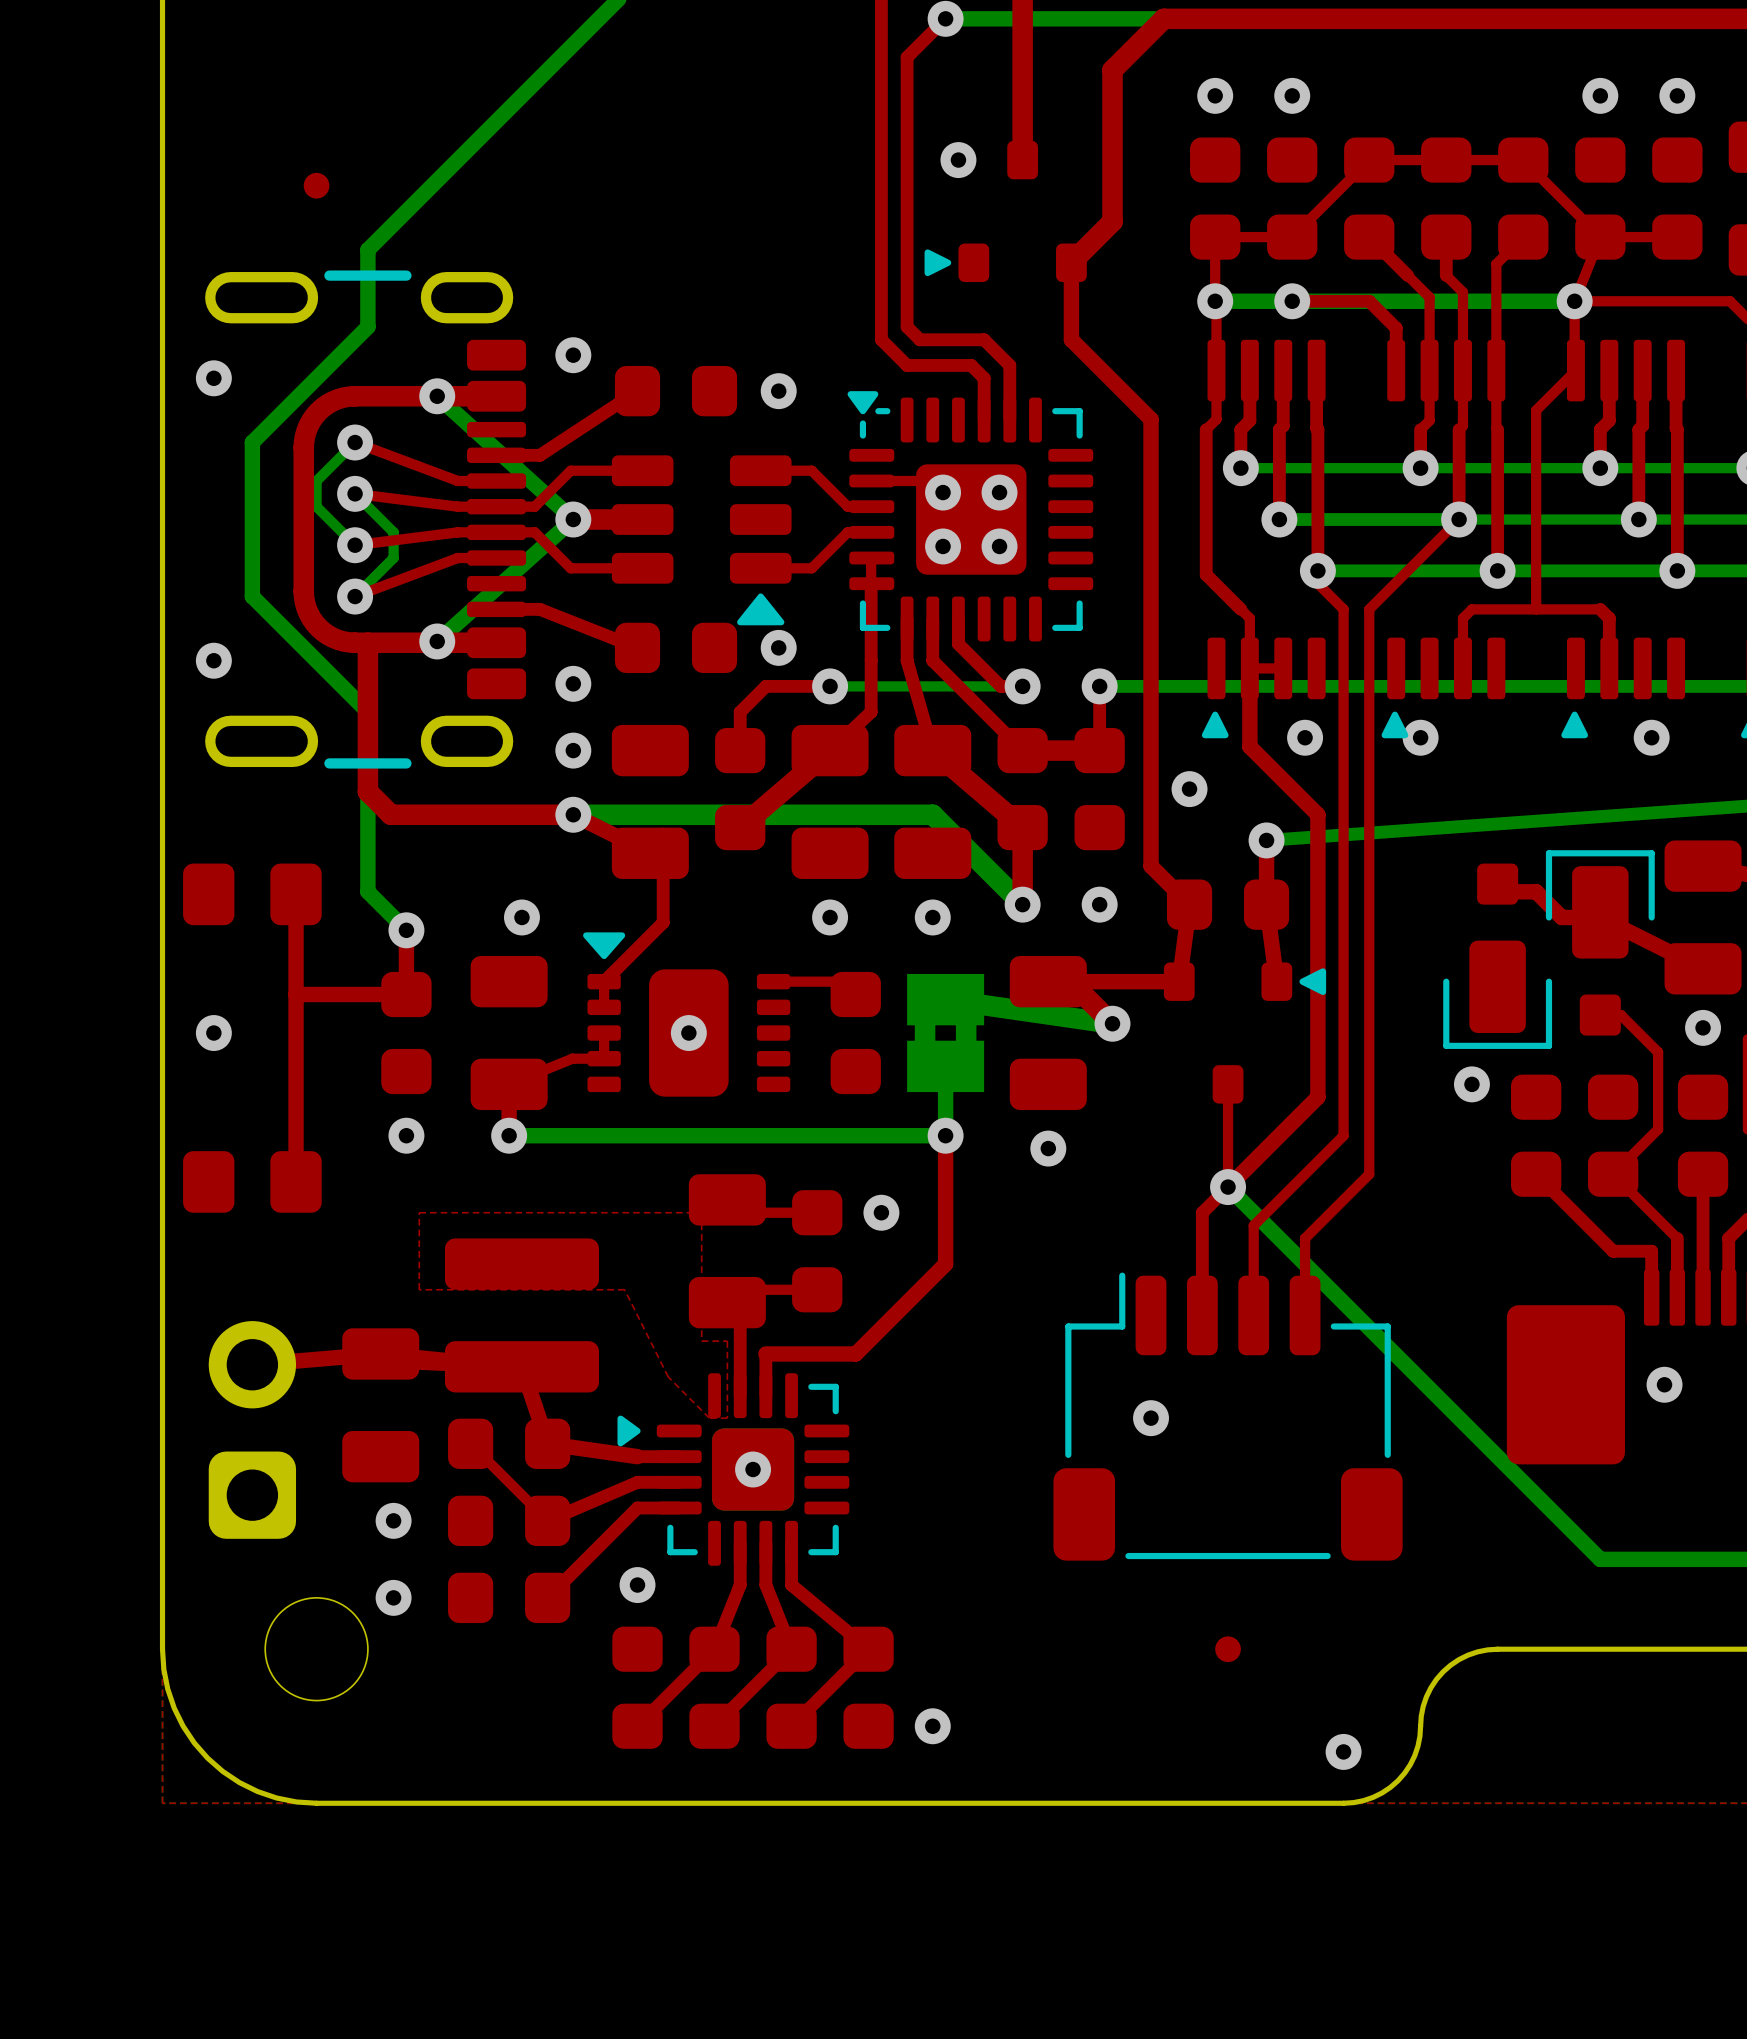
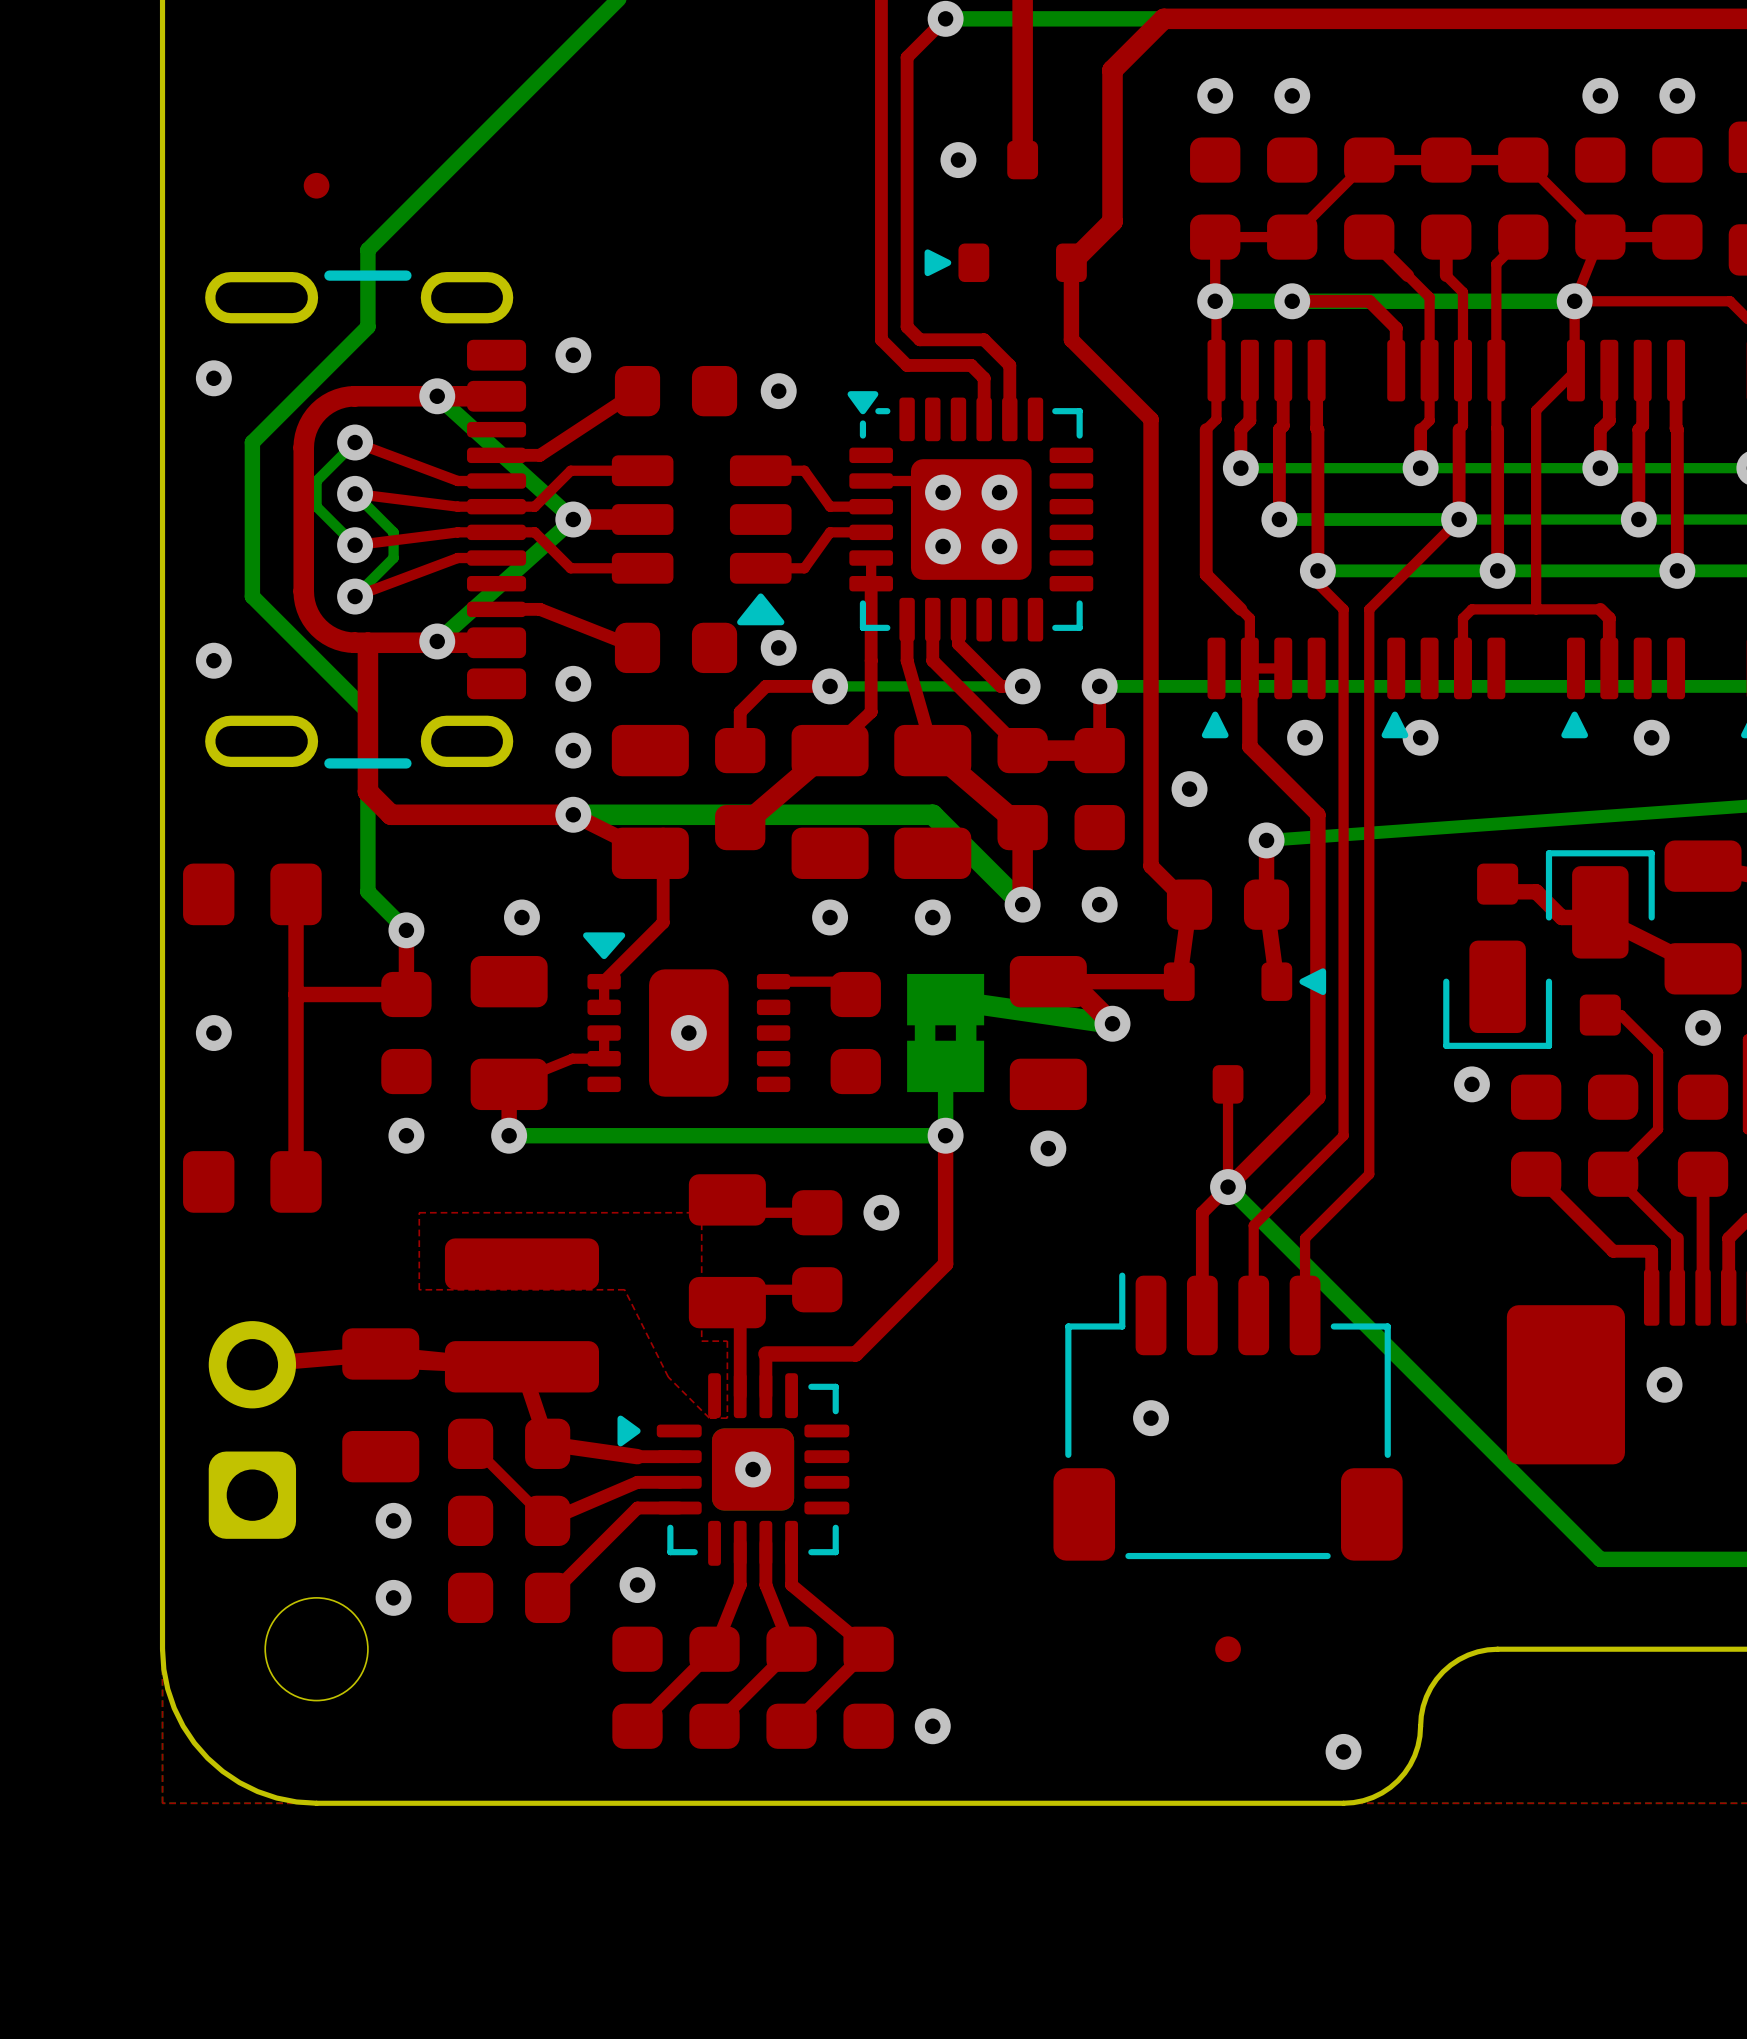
part footprint: [847, 391, 1094, 642] -> [847, 391, 1094, 642]
top track: (804, 470) (811, 470) (847, 506) -> (804, 470) (830, 506) (847, 506)
top track: (847, 532) (811, 568) (804, 568) -> (847, 532) (830, 532) (804, 568)

